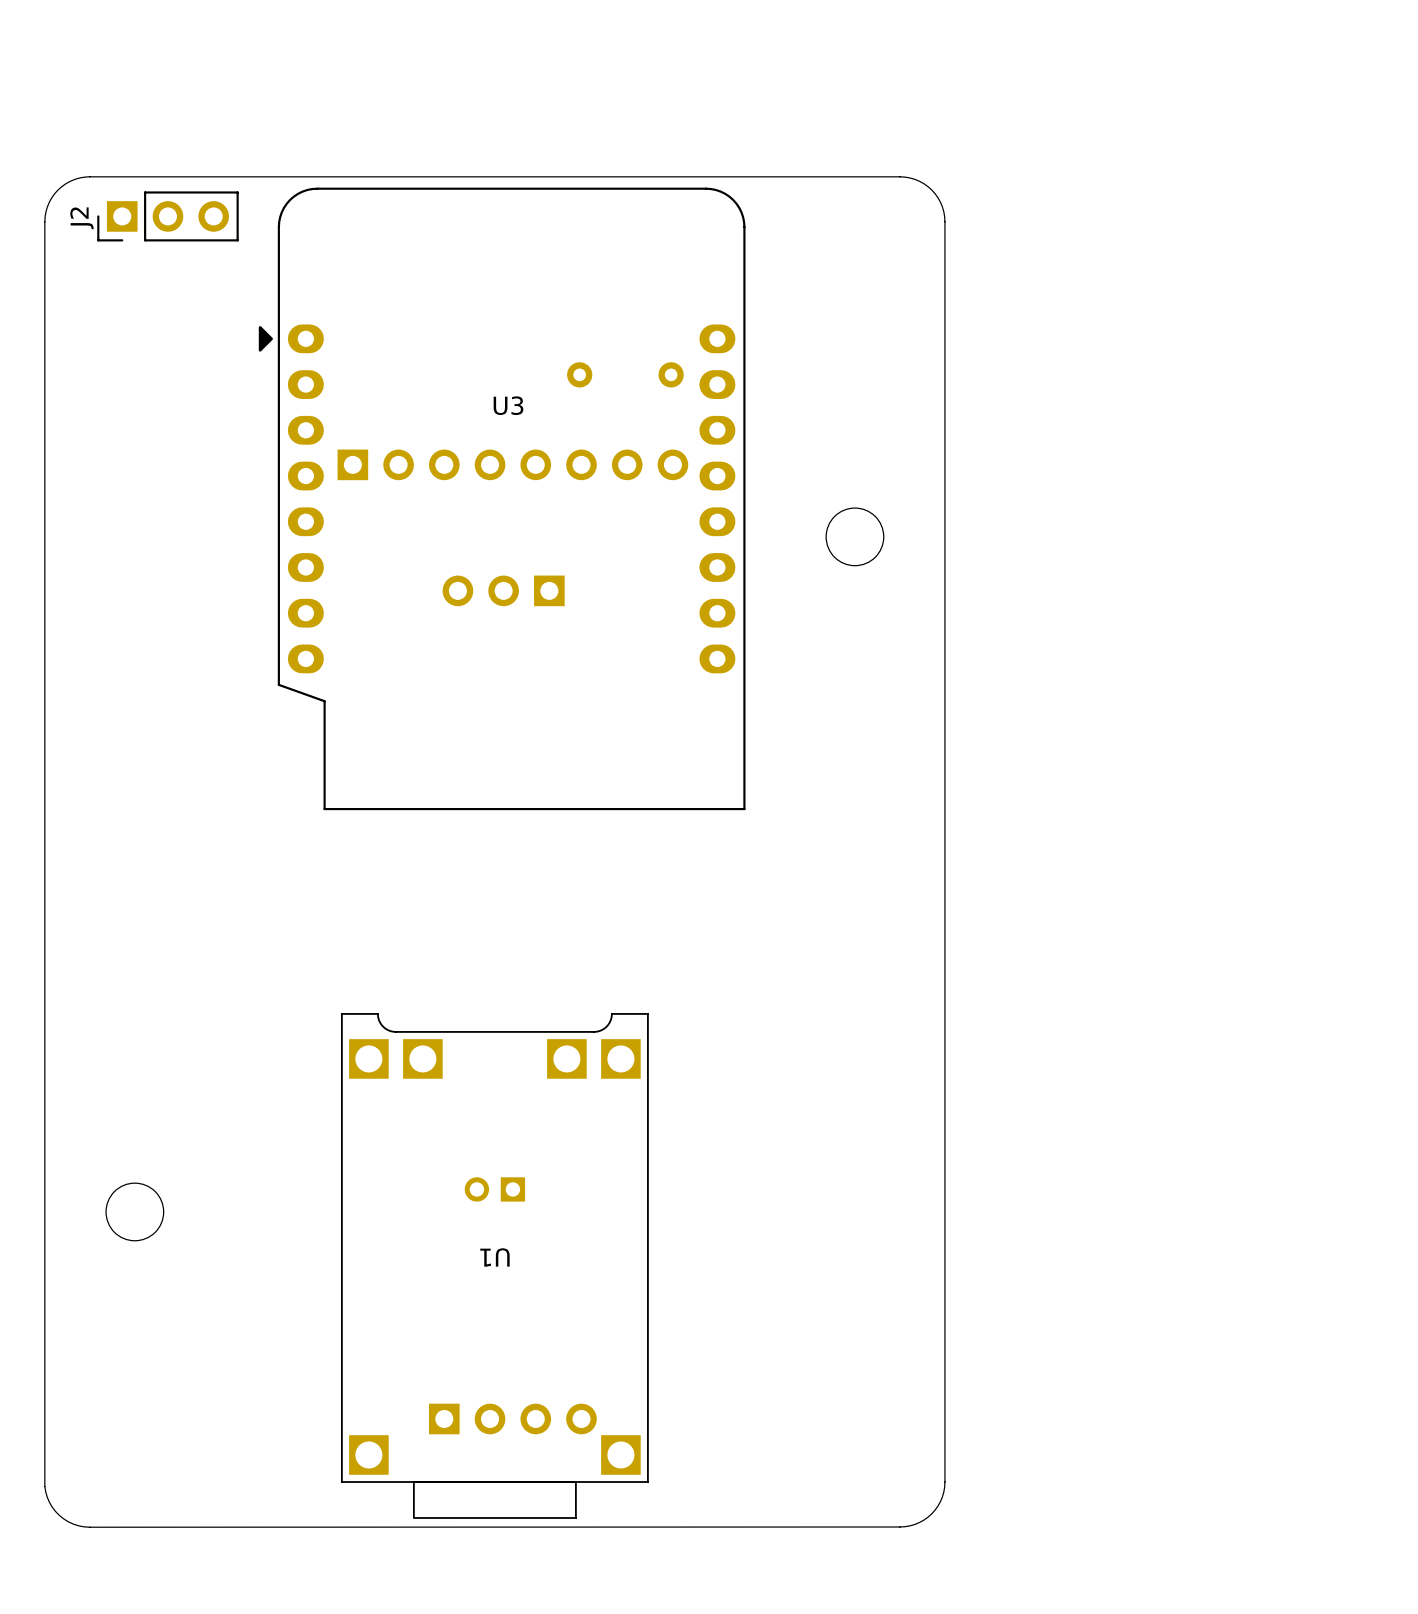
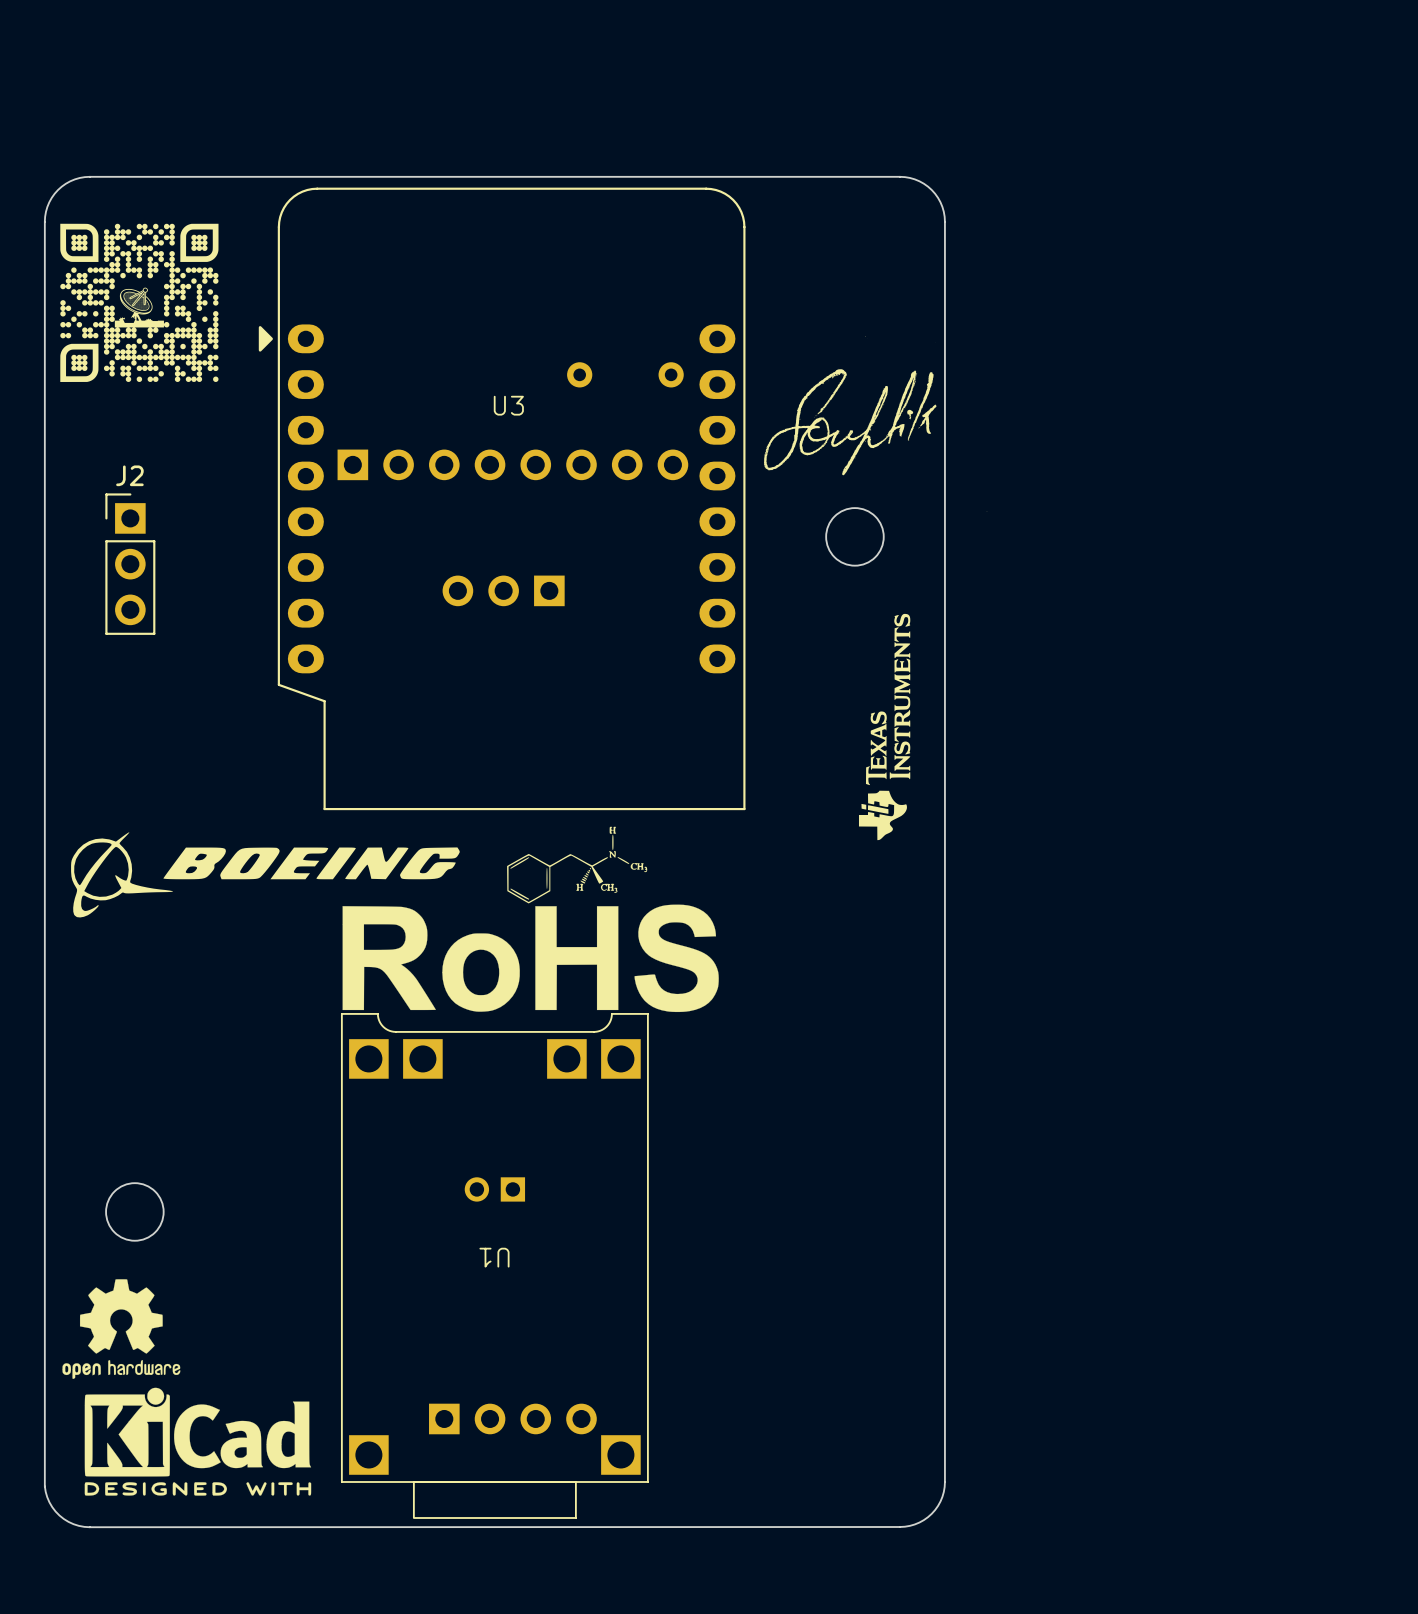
J2 rotation: 0° (167, 216) -> 90° clockwise (130, 564)
J2 position: (167, 216) -> (130, 564)
drawing: none -> [60, 223, 219, 382]
drawing: none -> [763, 335, 988, 512]
drawing: none -> [858, 613, 911, 841]
drawing: none -> [71, 826, 719, 1013]
drawing: none -> [62, 1279, 312, 1496]

